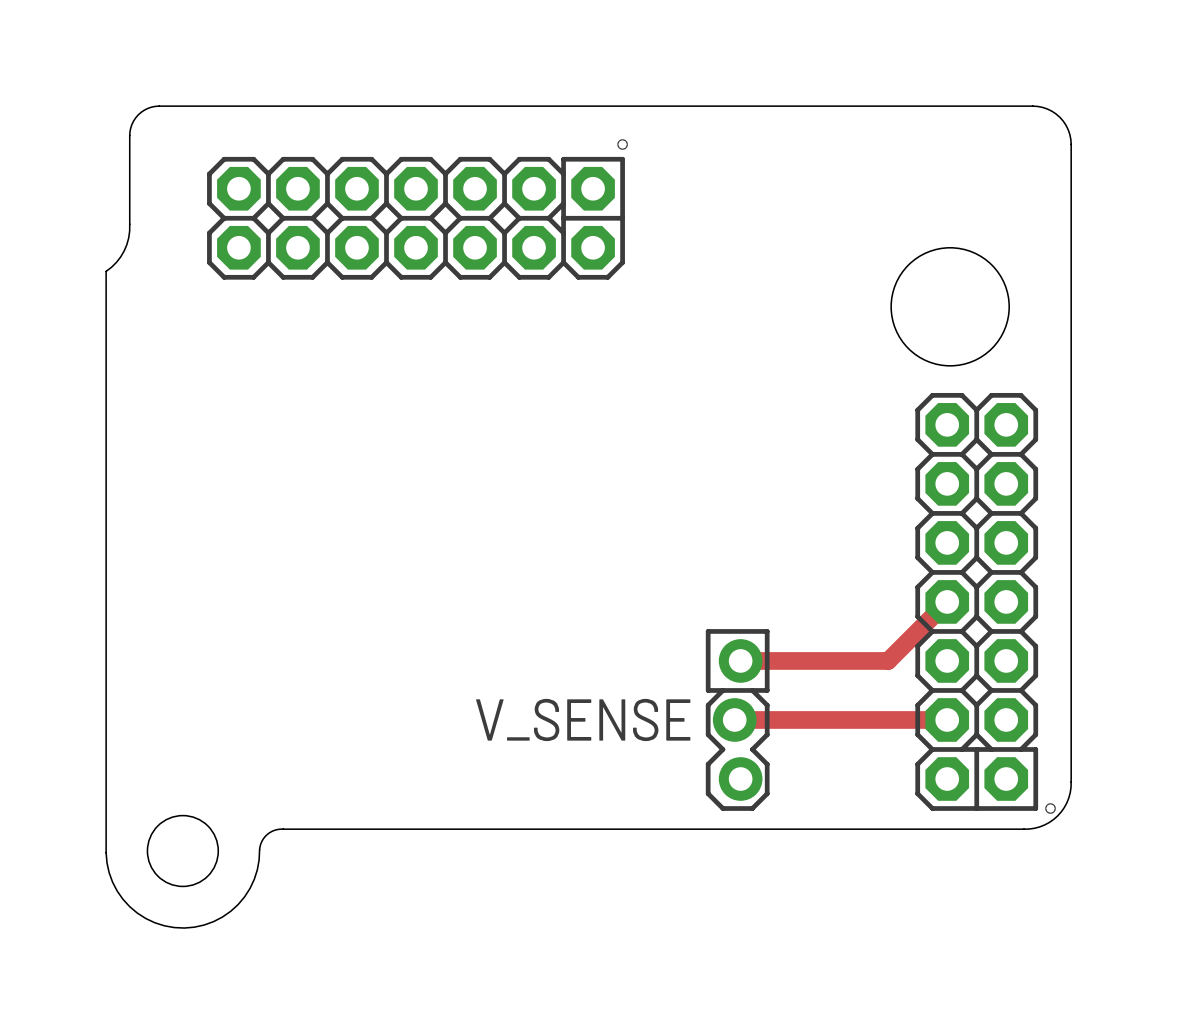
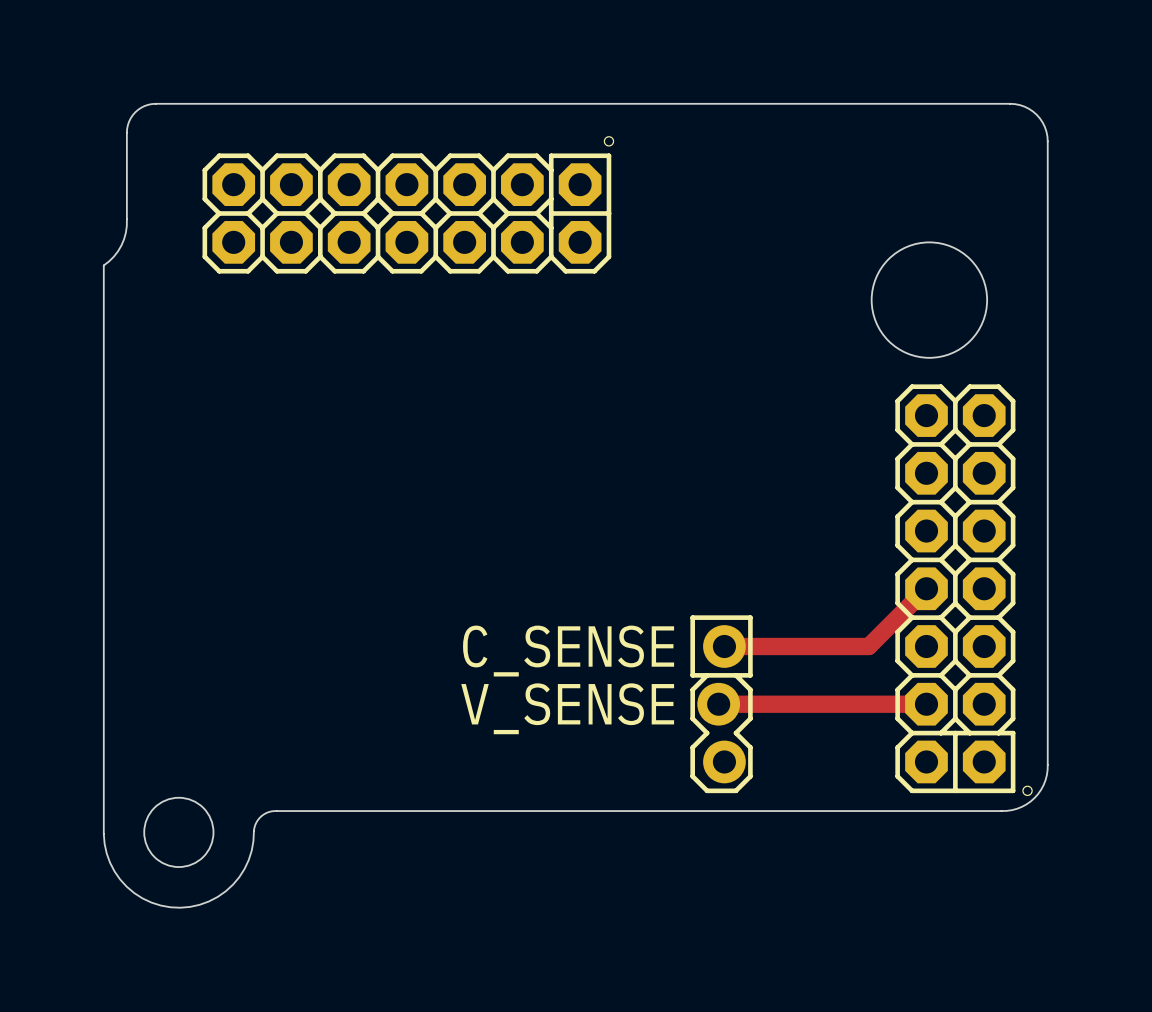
text: none -> C_SENSE (568, 651)

